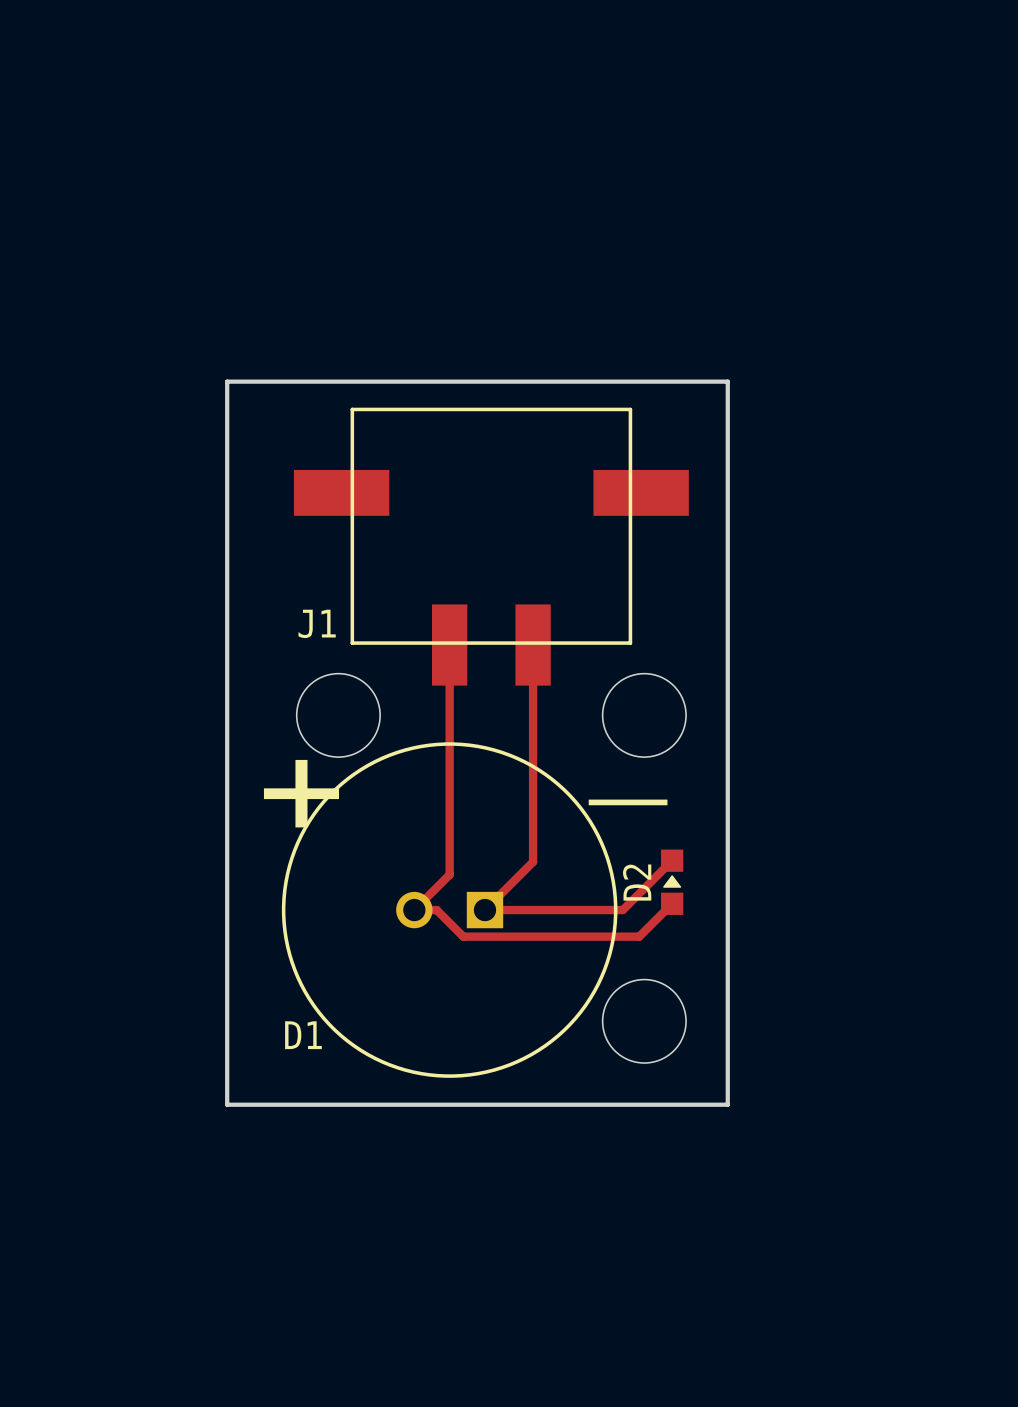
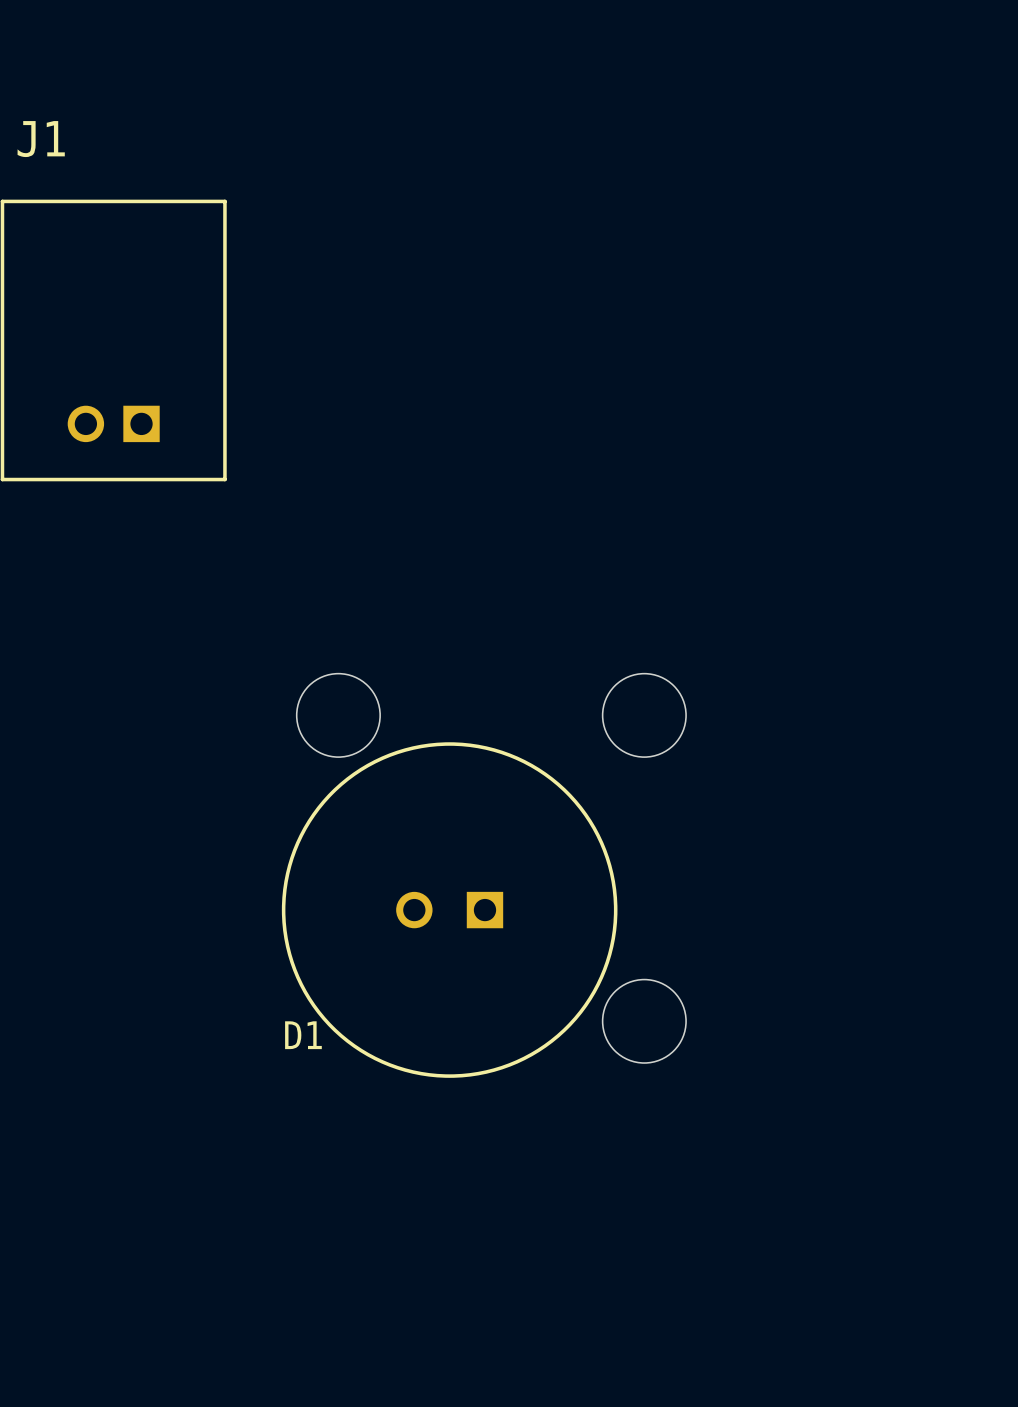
J1: none -> (113, 340)
board edge: (227, 381) (727, 381) (727, 1104) (227, 1104) (227, 381) -> none
part: (491, 546) -> none
text: J1 (317, 623) -> none
top track: (449, 645) (449, 874) (414, 910) (436, 910) (463, 936) (639, 936) (672, 903) -> none
top track: (533, 645) (533, 861) (484, 910) (622, 910) (672, 860) -> none
text: + (301, 793) -> none
text: _ (628, 802) -> none
D2: (672, 882) -> none

